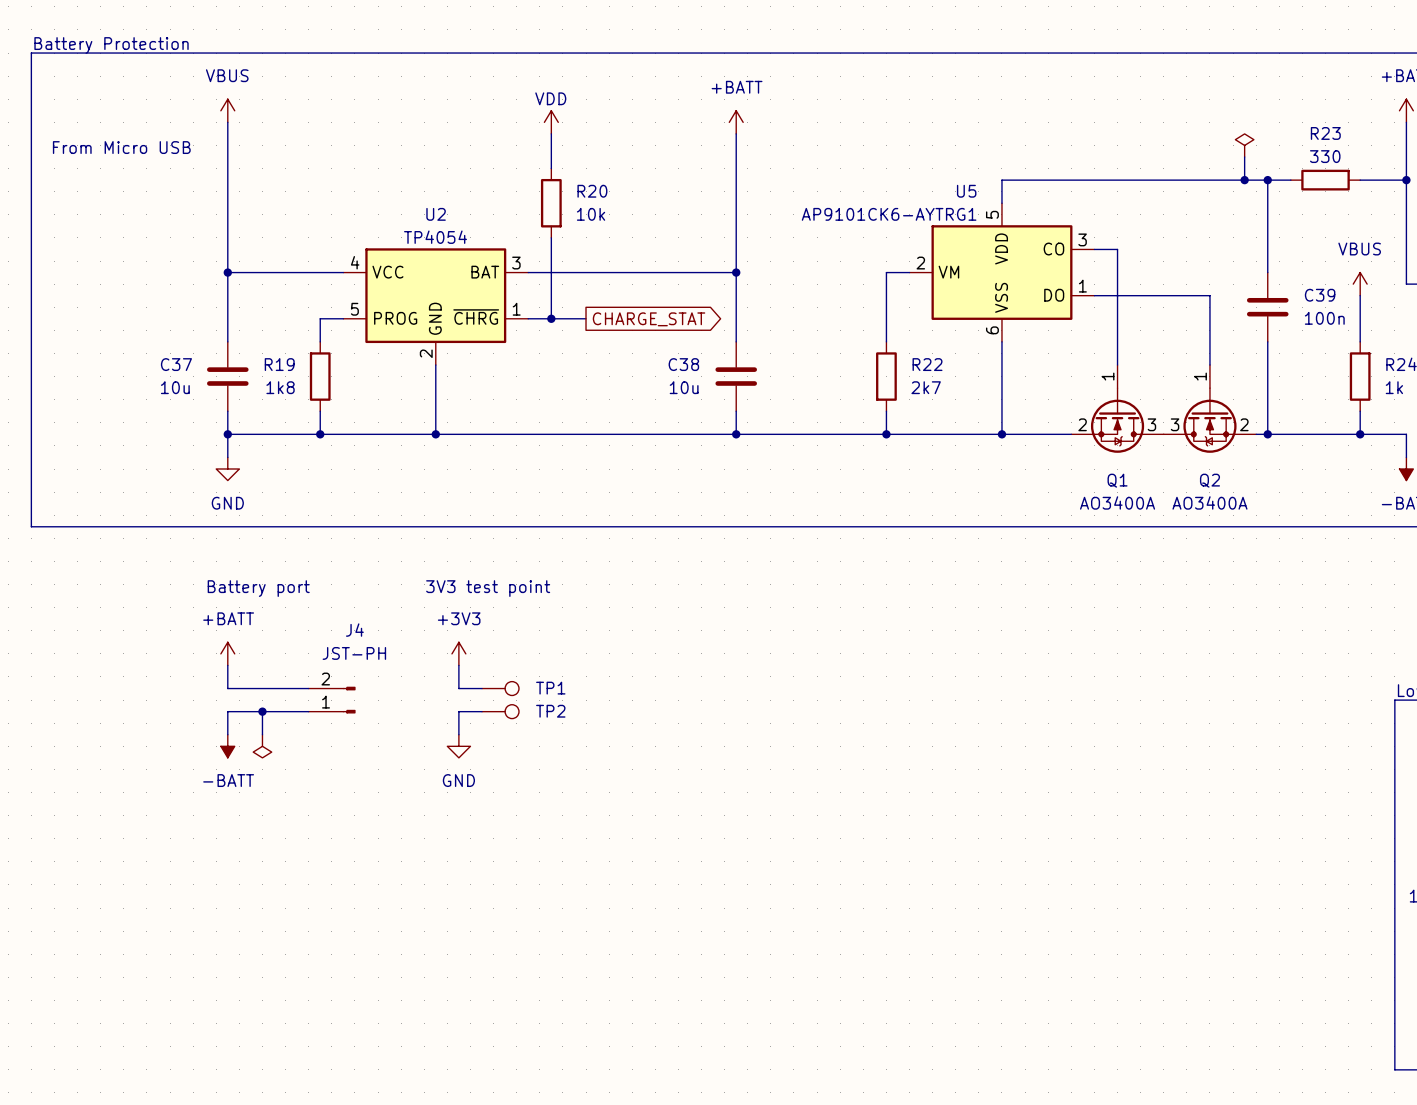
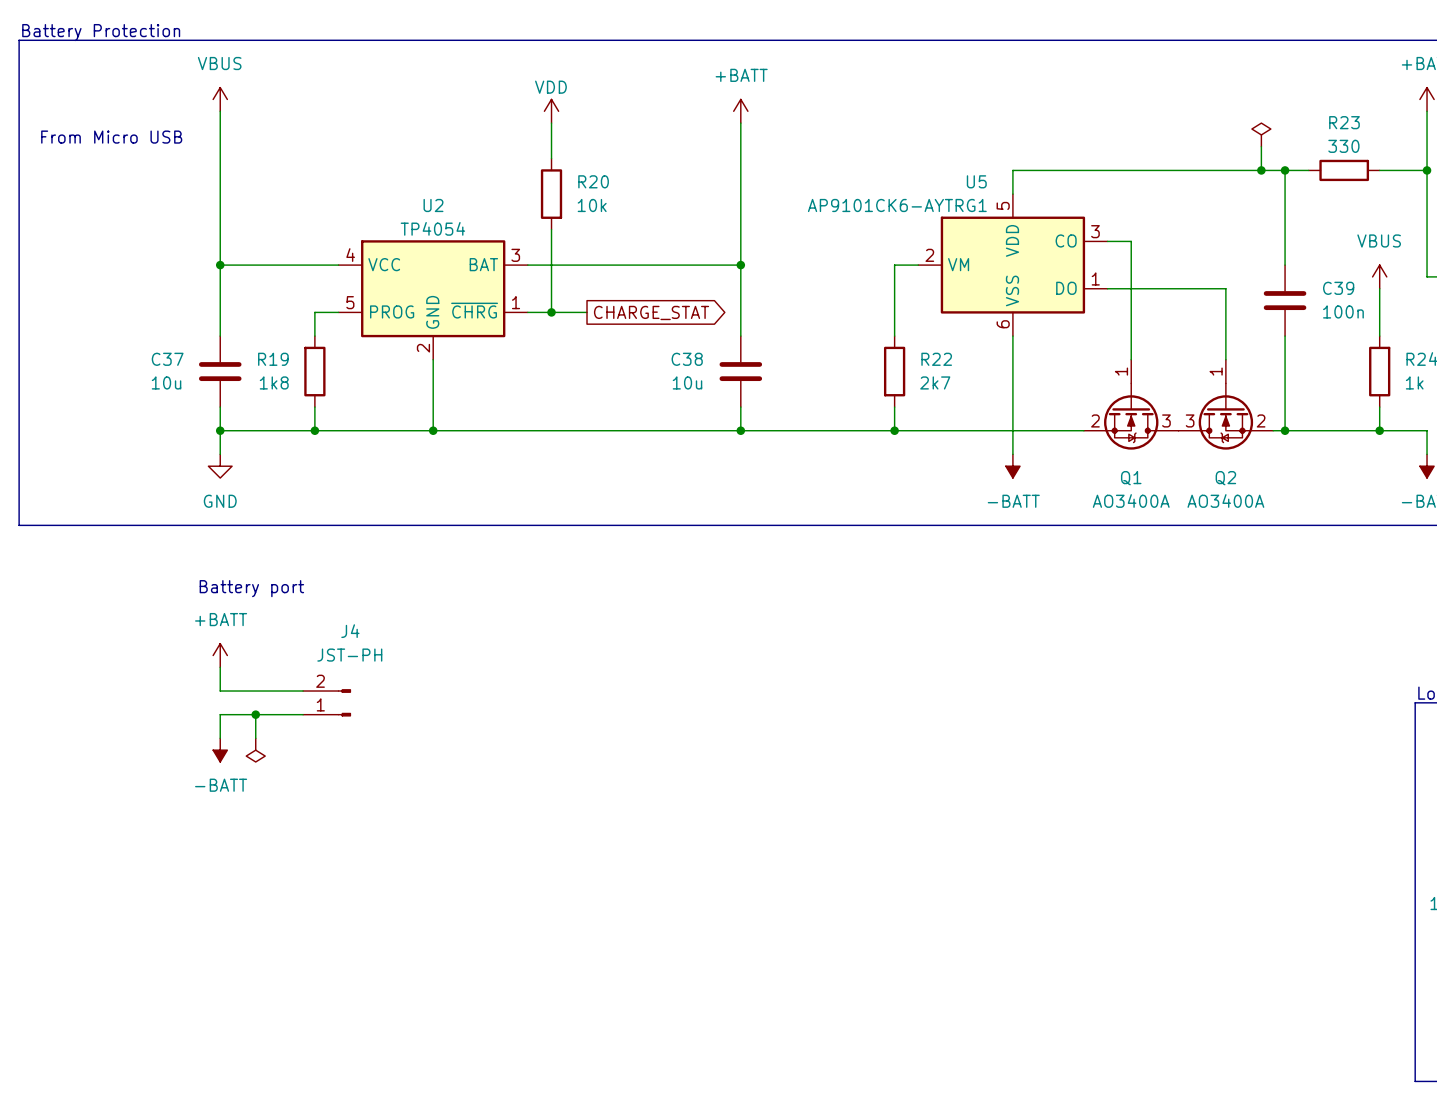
wire: none -> (1012, 430) (1012, 454)
junction: (1001, 434) -> none
power symbol: none -> -BATT (1012, 466)
text: 3V3 test point (488, 588) -> none
power symbol: +3V3 (458, 653) -> none
wire: (458, 665) (458, 688) (482, 688) -> none
TP1: (500, 688) -> none
wire: (482, 711) (458, 711) (458, 734) -> none
TP2: (500, 711) -> none
power symbol: GND (458, 746) -> none

